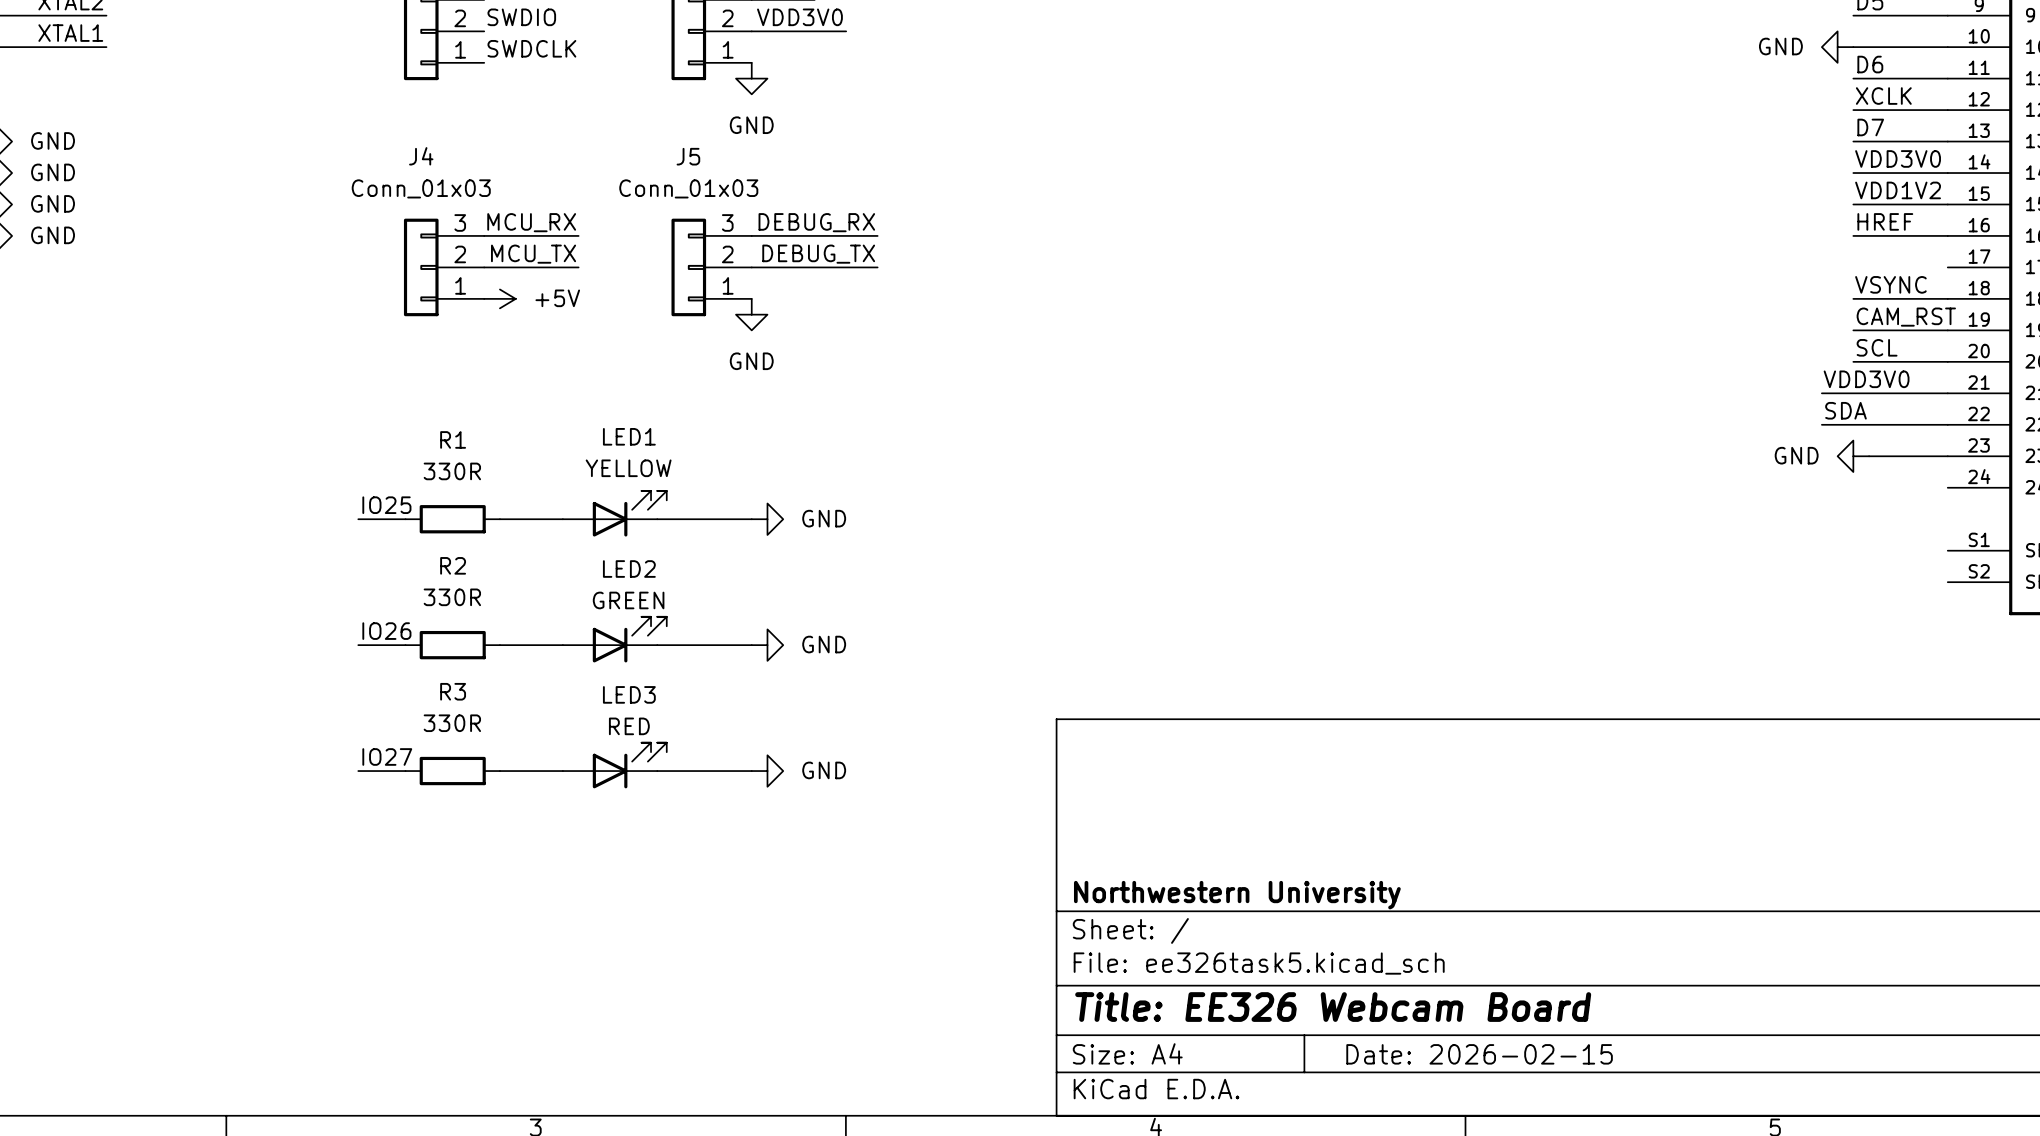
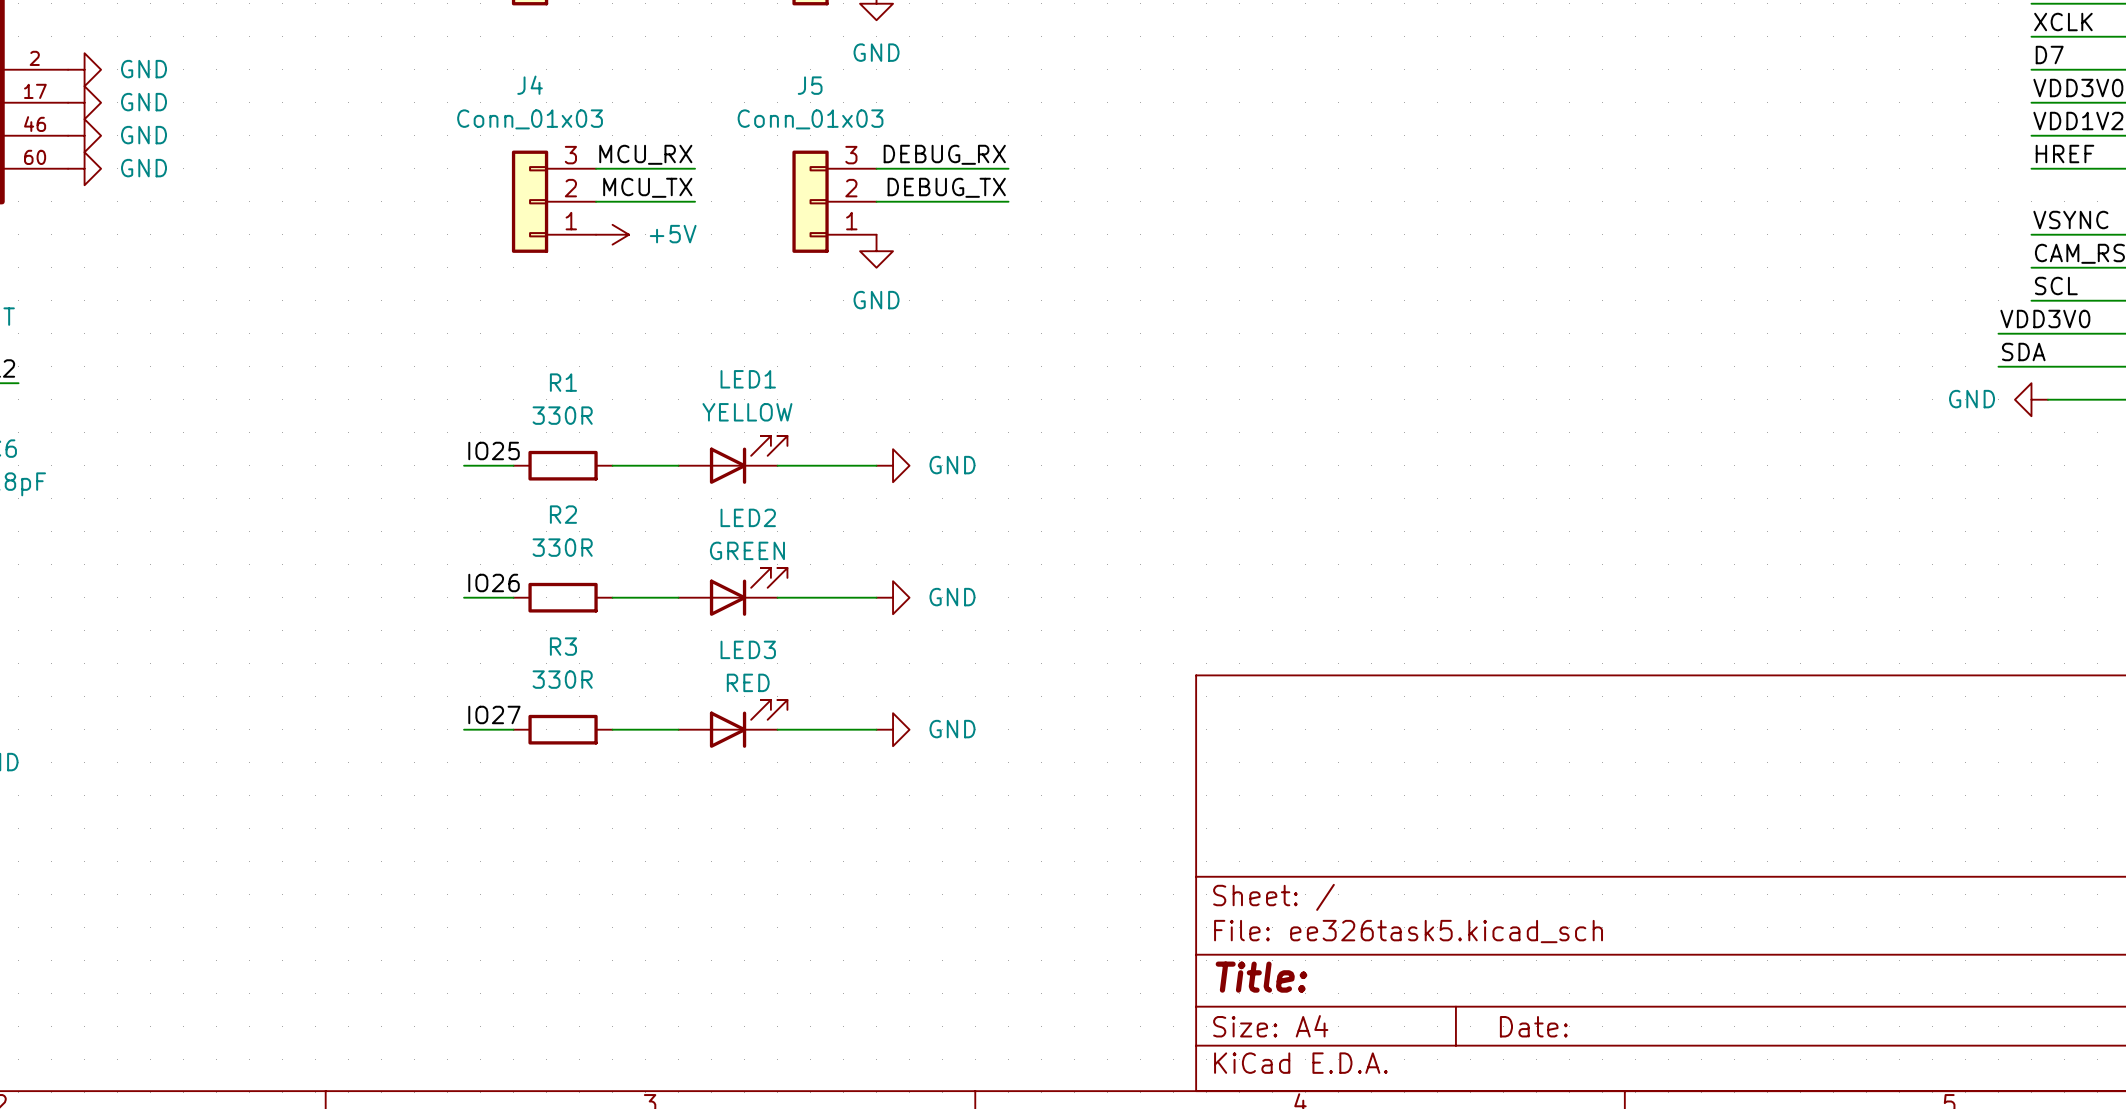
title block: Northwestern University (1237, 895) -> none
title block: Title: EE326 Webcam Board (1333, 1007) -> Title: (1261, 977)
title block: Date: 2026-02-15 (1479, 1054) -> Date: (1533, 1026)

